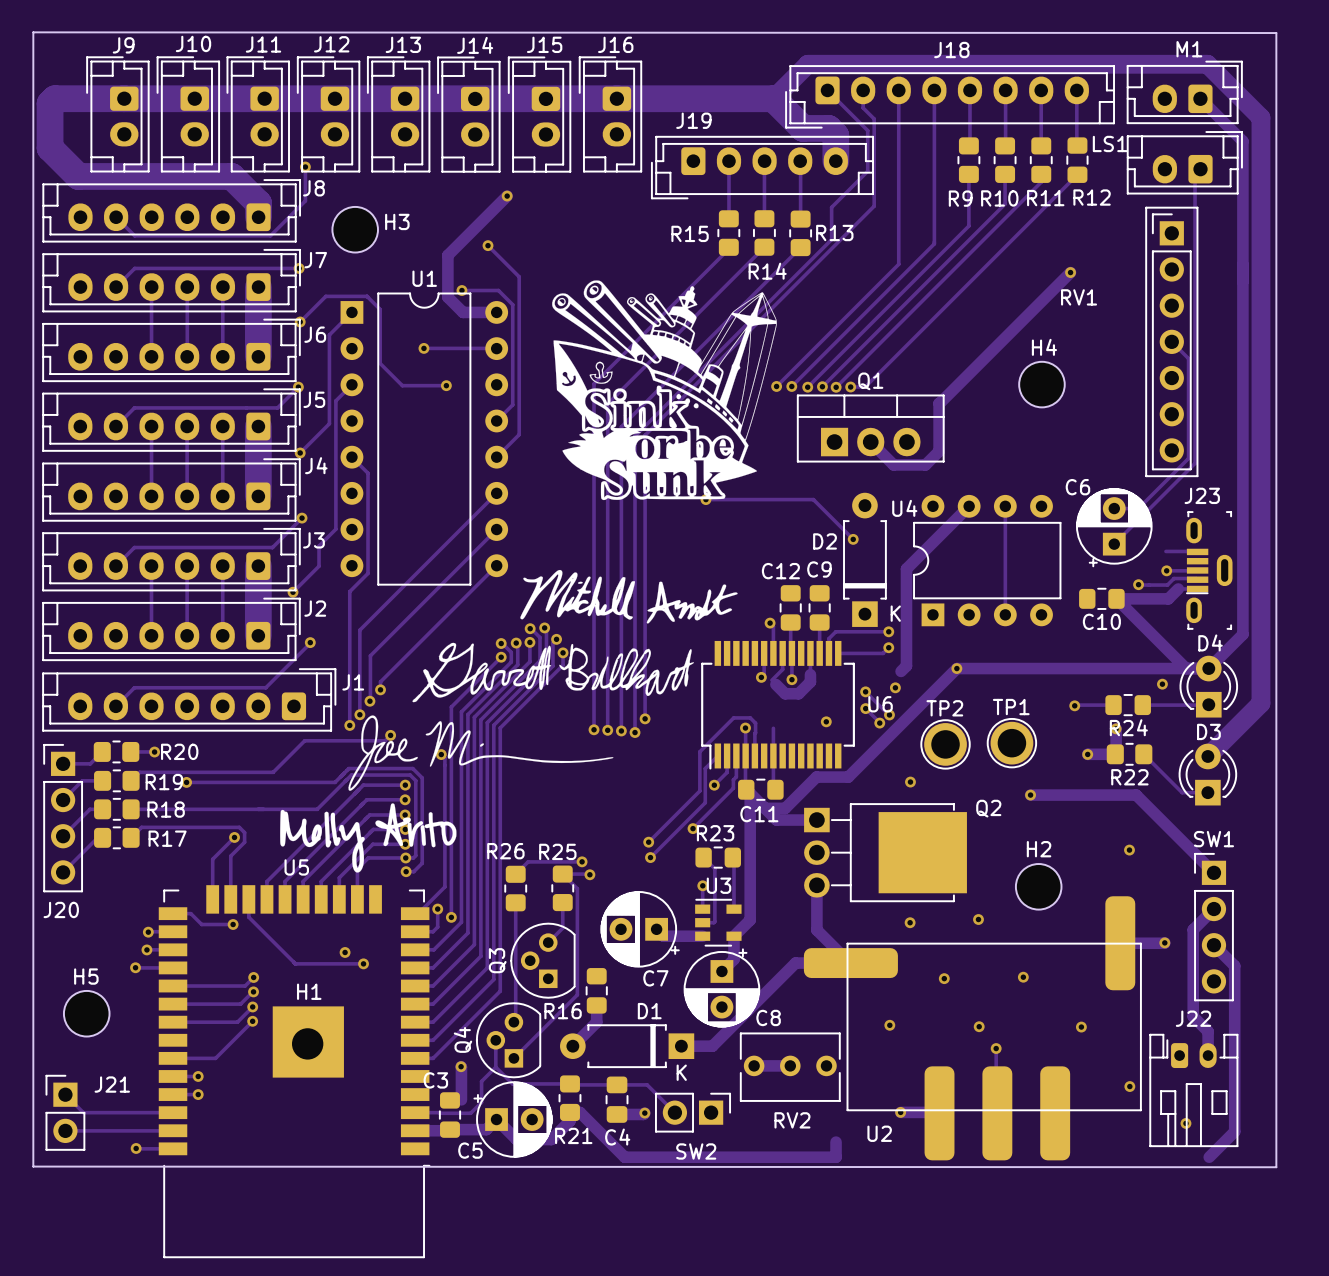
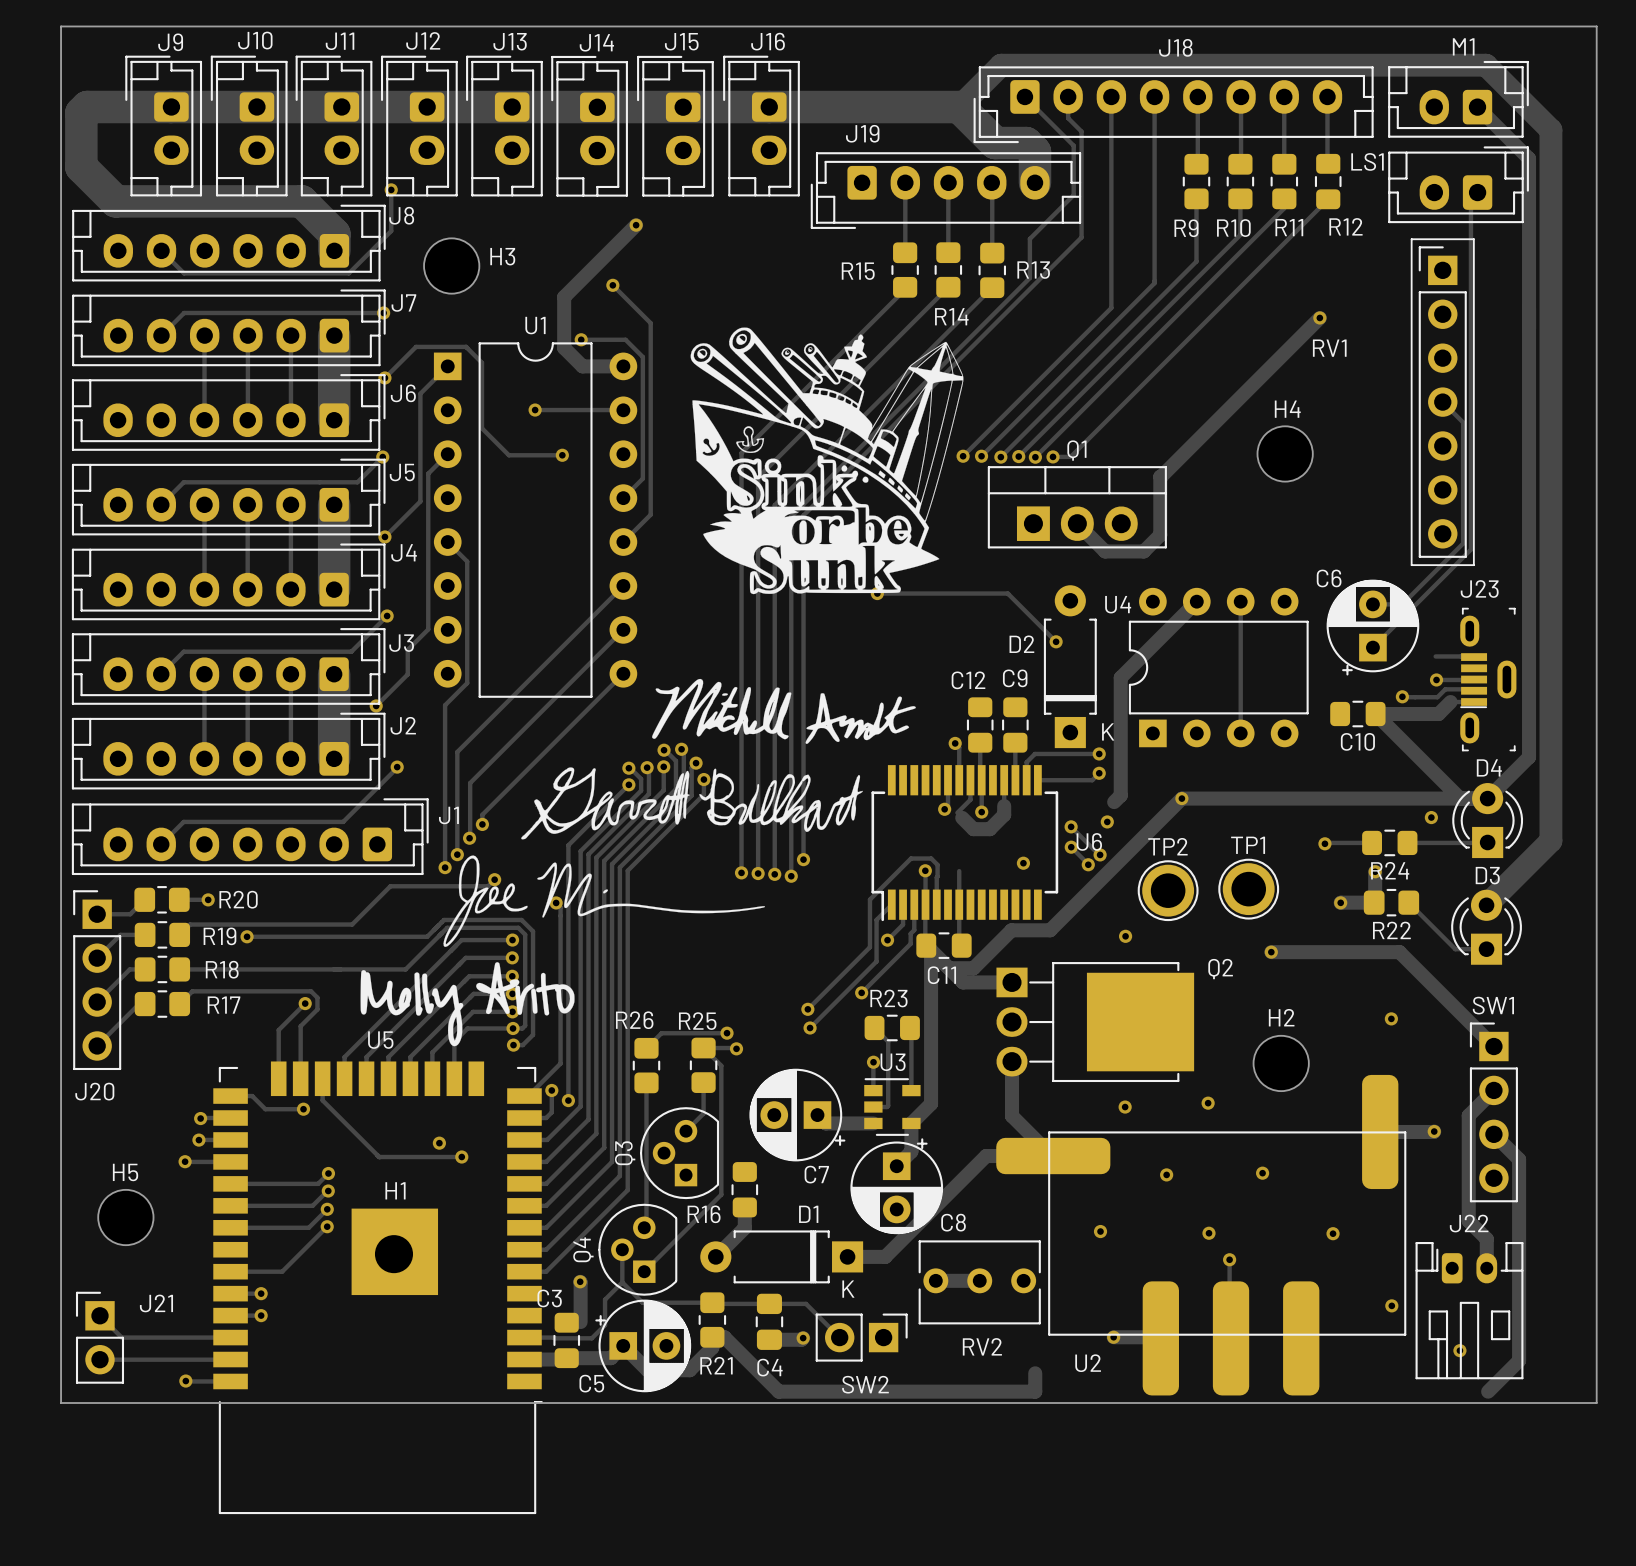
board edge: (33, 32) (1276, 33) (1276, 1167) (33, 1166) -> (61, 26) (1596, 26) (1596, 1403) (61, 1403)

